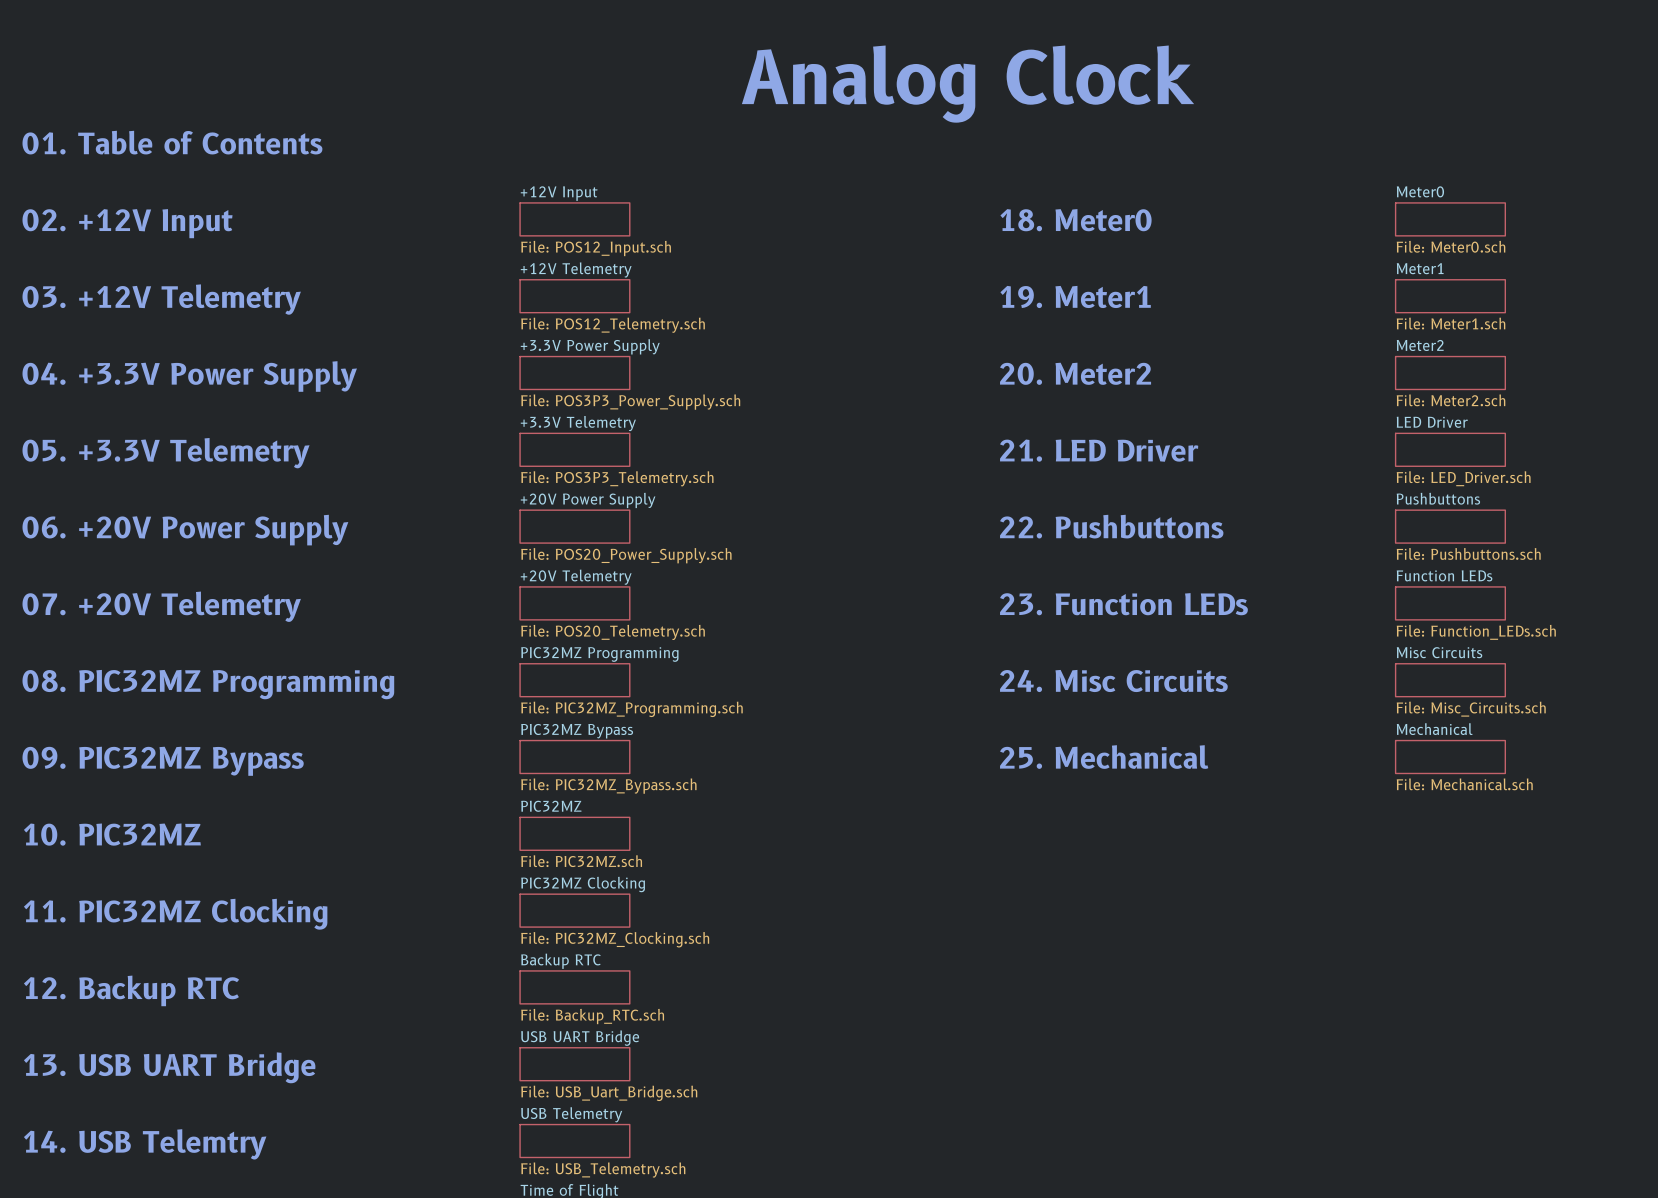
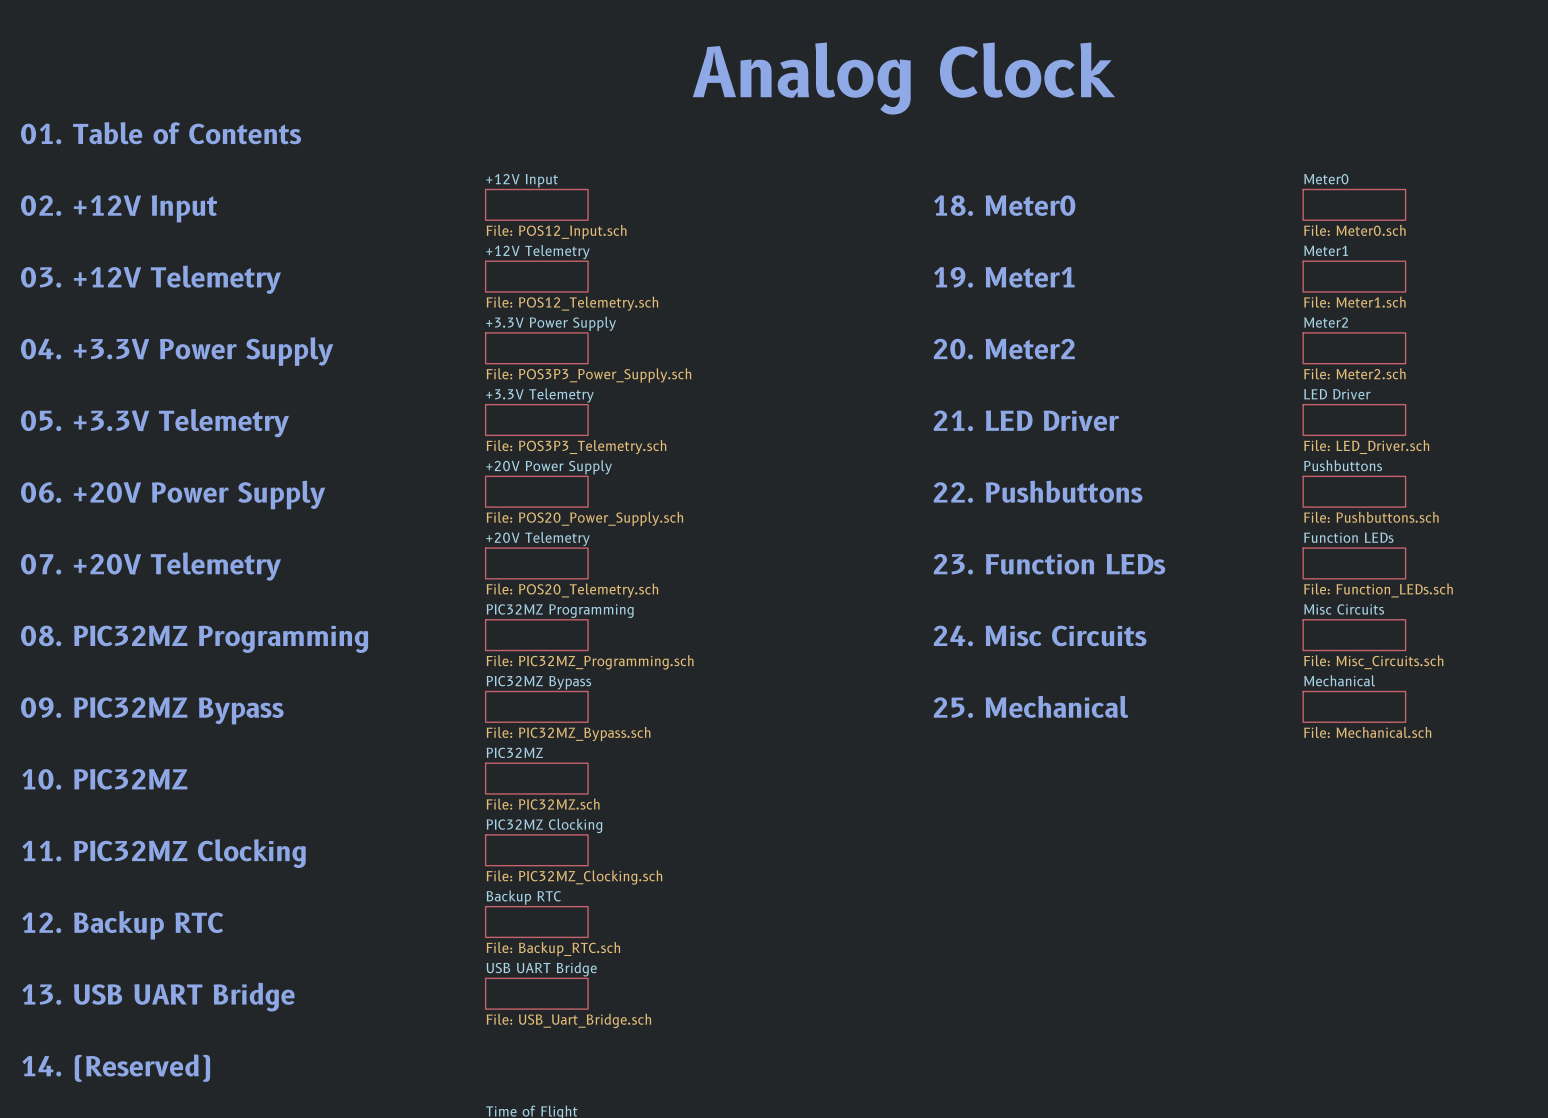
sheet USB Telemetry: File: USB_Telemetry.sch (574, 1141) -> none
text: 14. USB Telemtry (145, 1144) -> 14. (Reserved) (116, 1068)

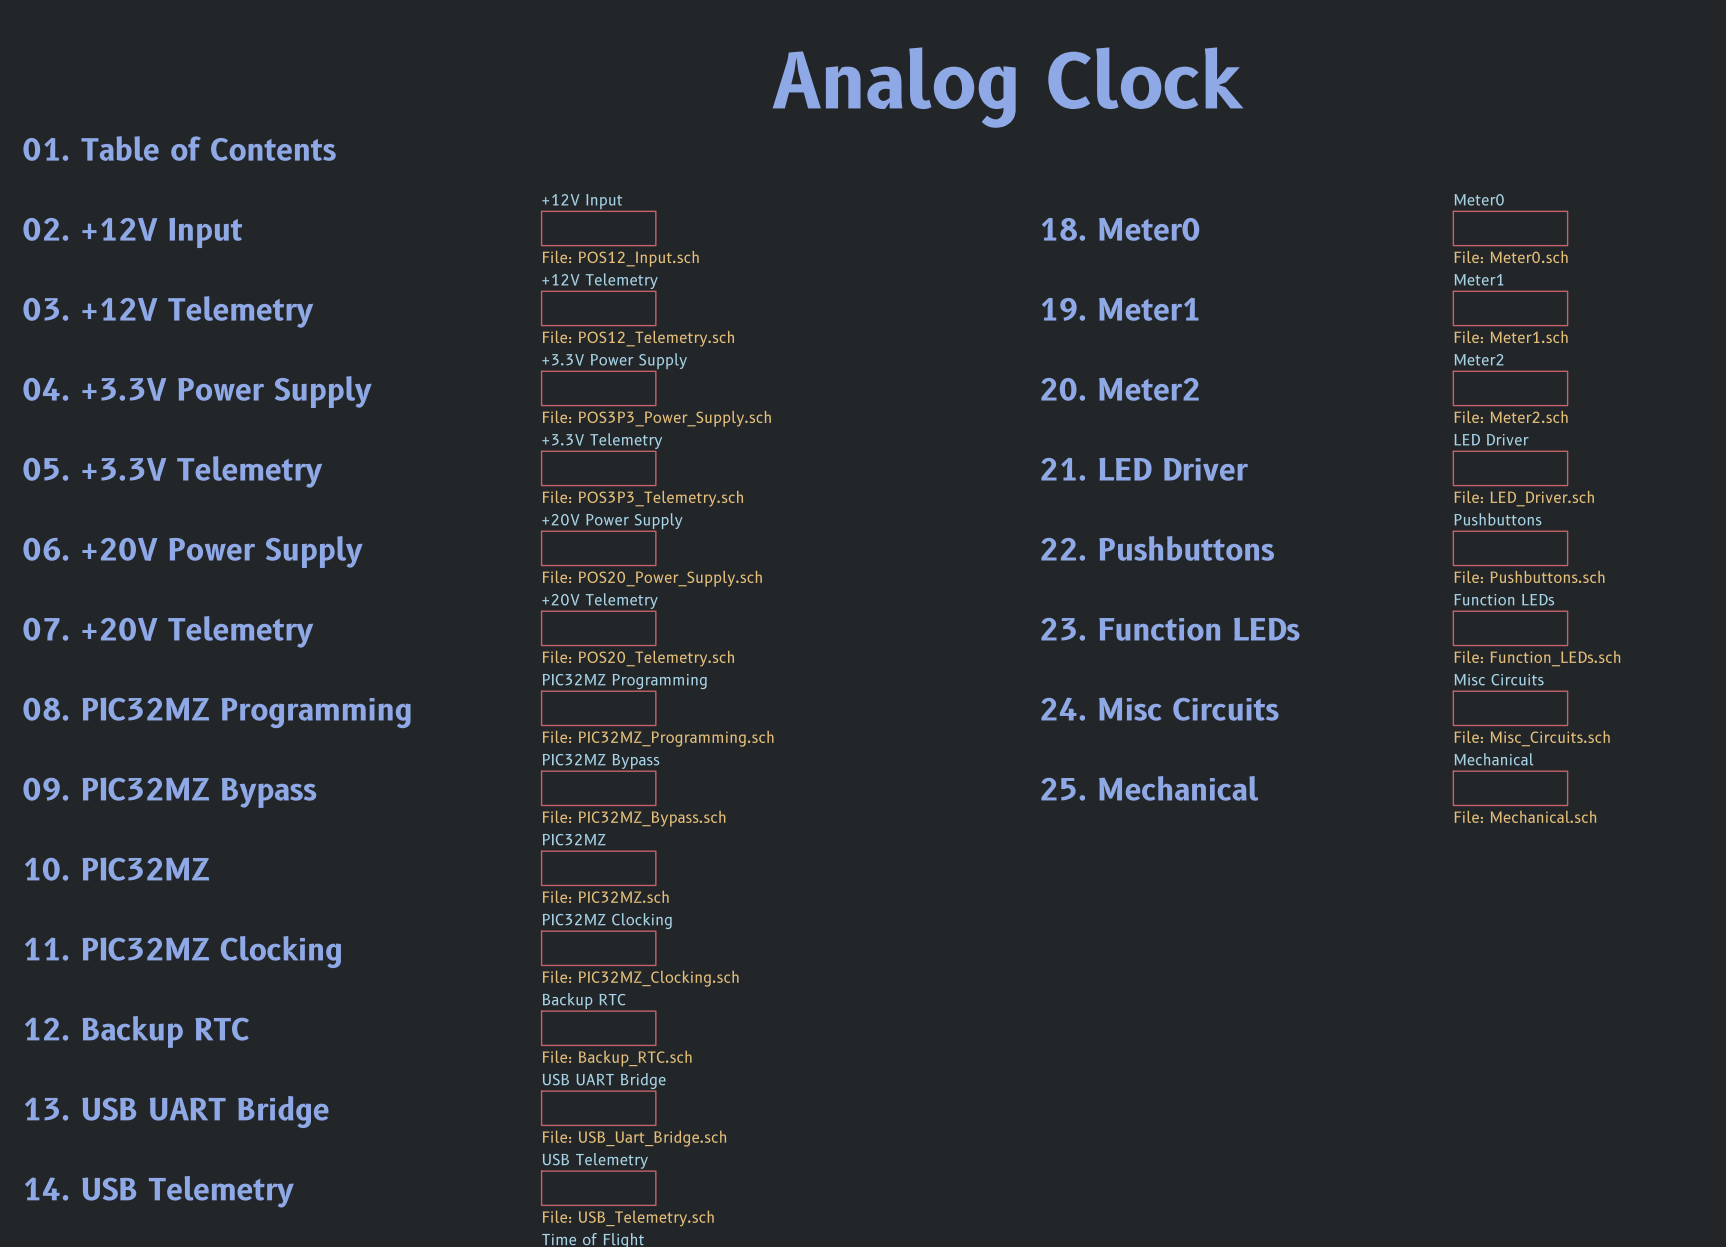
sheet USB Telemetry: none -> File: USB_Telemetry.sch (598, 1188)
text: 14. (Reserved) (116, 1068) -> 14. USB Telemetry (159, 1191)

